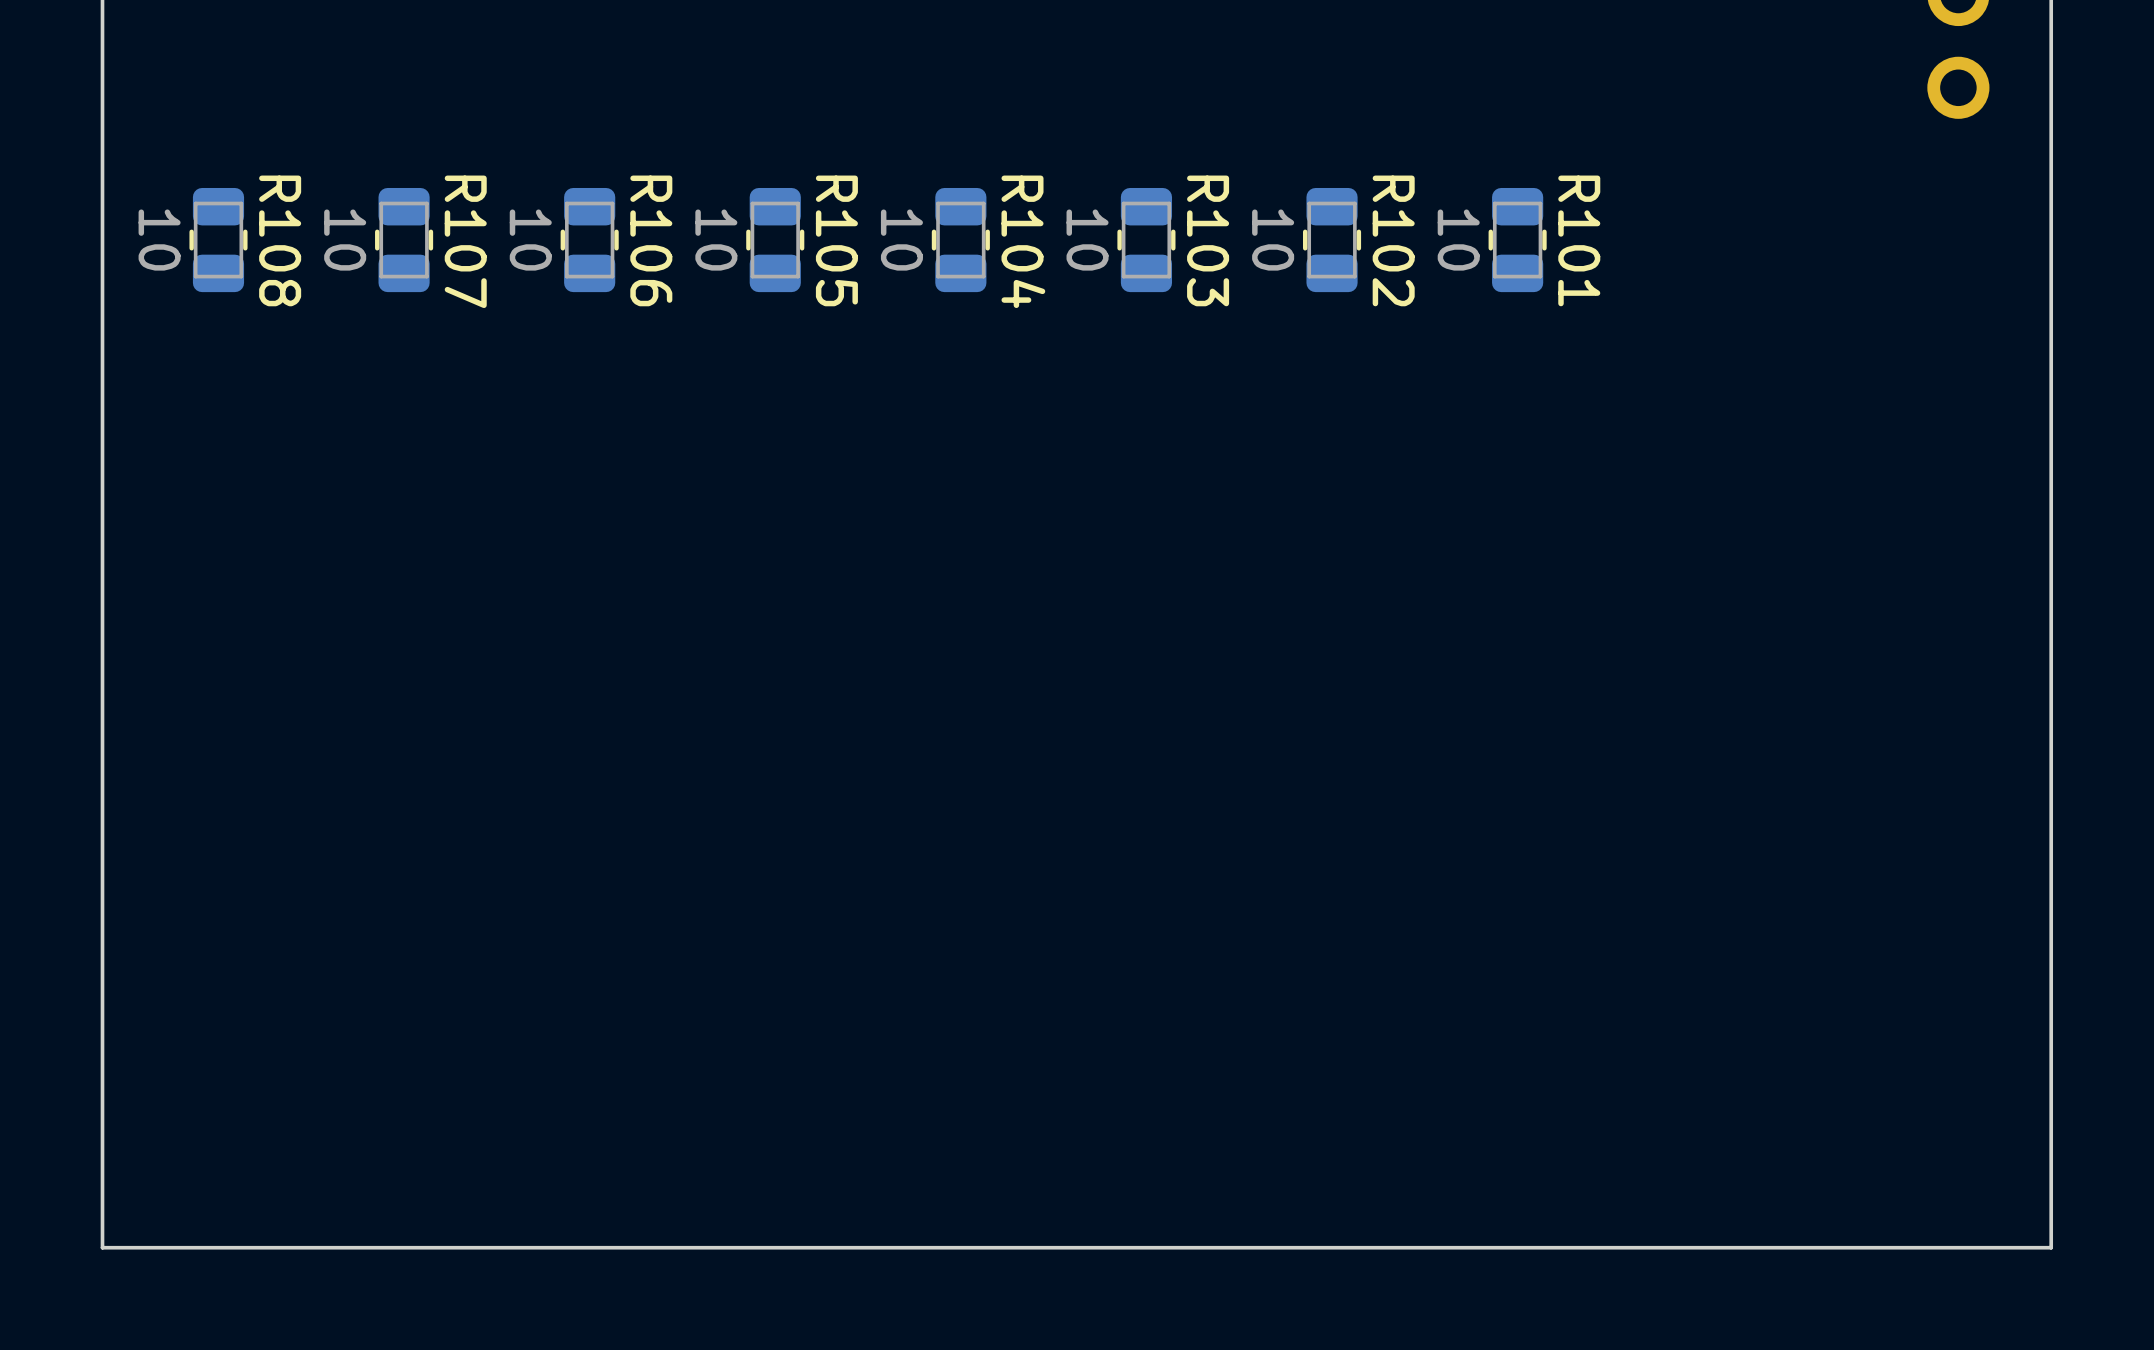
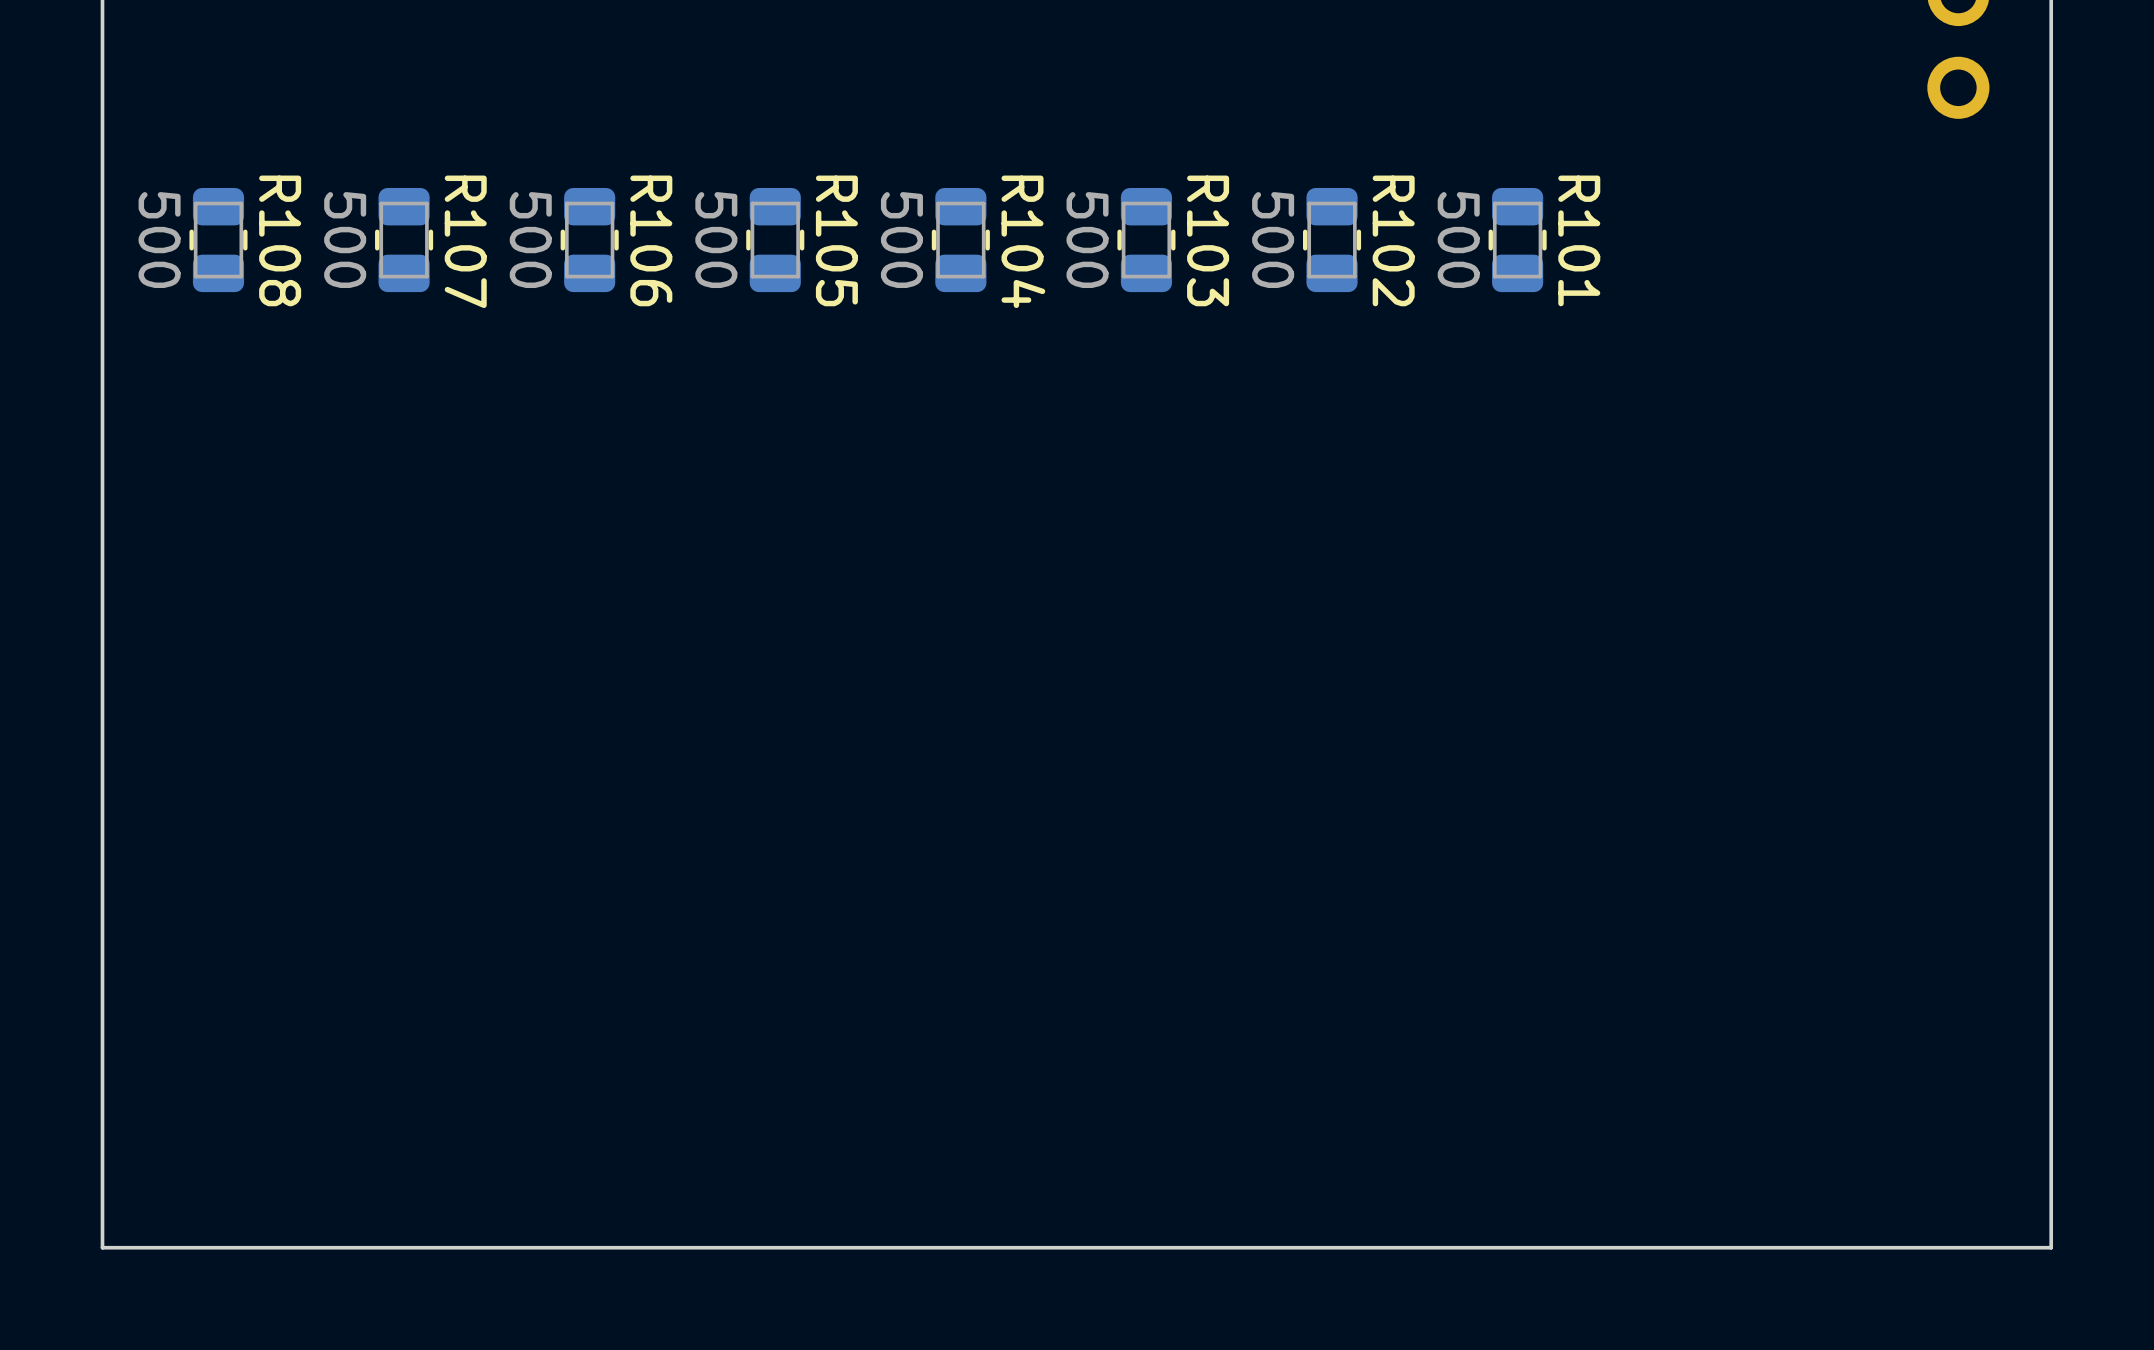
R108 value: 10 (159, 240) -> 500 (159, 240)
R107 value: 10 (345, 240) -> 500 (345, 240)
R106 value: 10 (530, 240) -> 500 (530, 240)
R105 value: 10 (716, 240) -> 500 (716, 240)
R104 value: 10 (901, 240) -> 500 (901, 240)
R103 value: 10 (1087, 240) -> 500 (1087, 240)
R102 value: 10 (1273, 240) -> 500 (1273, 240)
R101 value: 10 (1458, 240) -> 500 (1458, 240)

